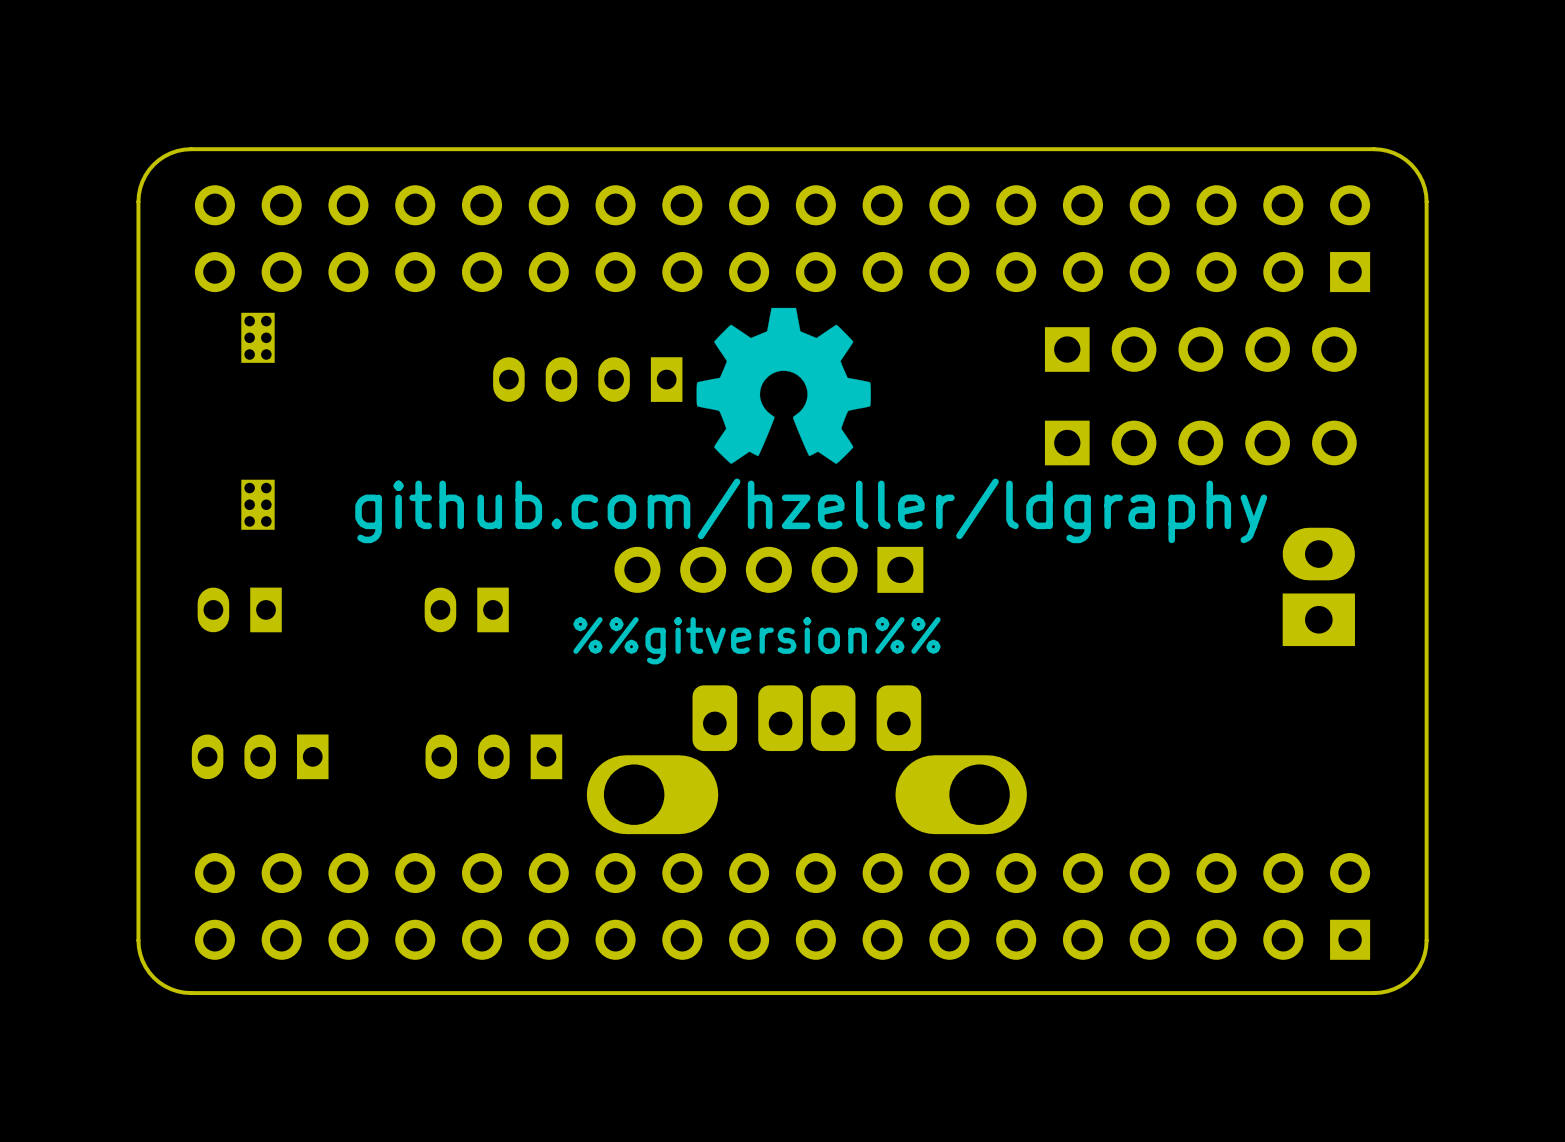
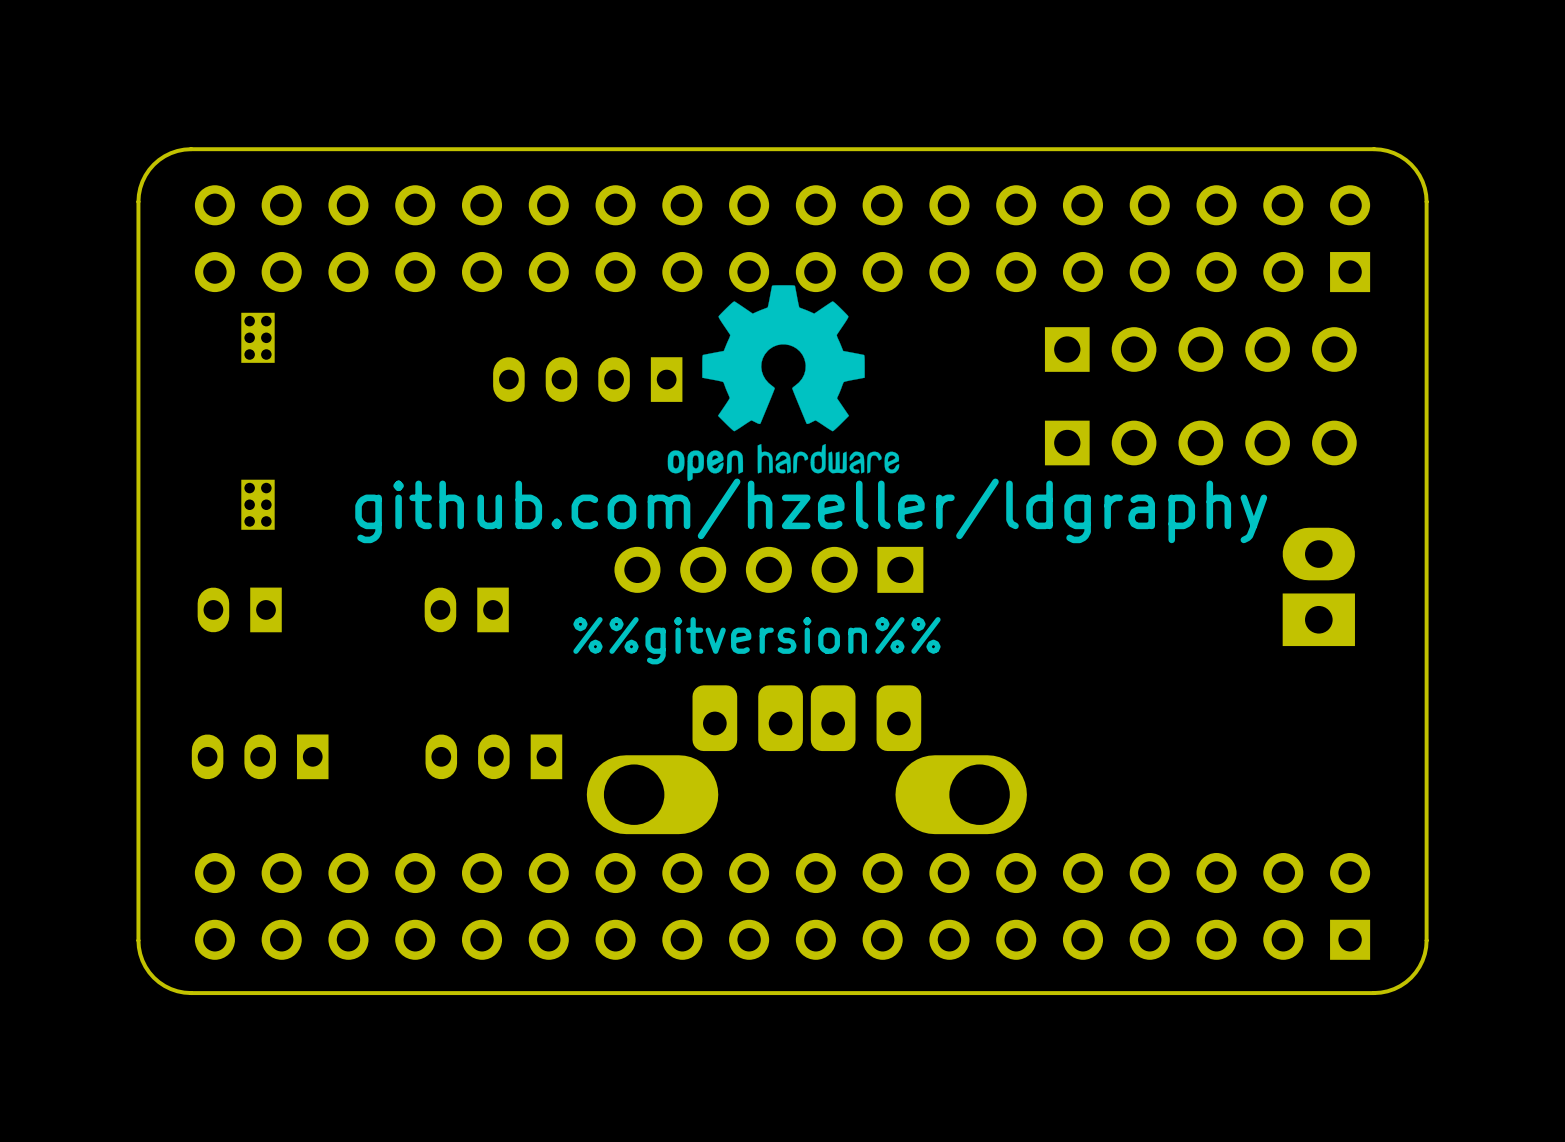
drawing shape: [696, 307, 871, 464] -> [667, 285, 900, 482]

